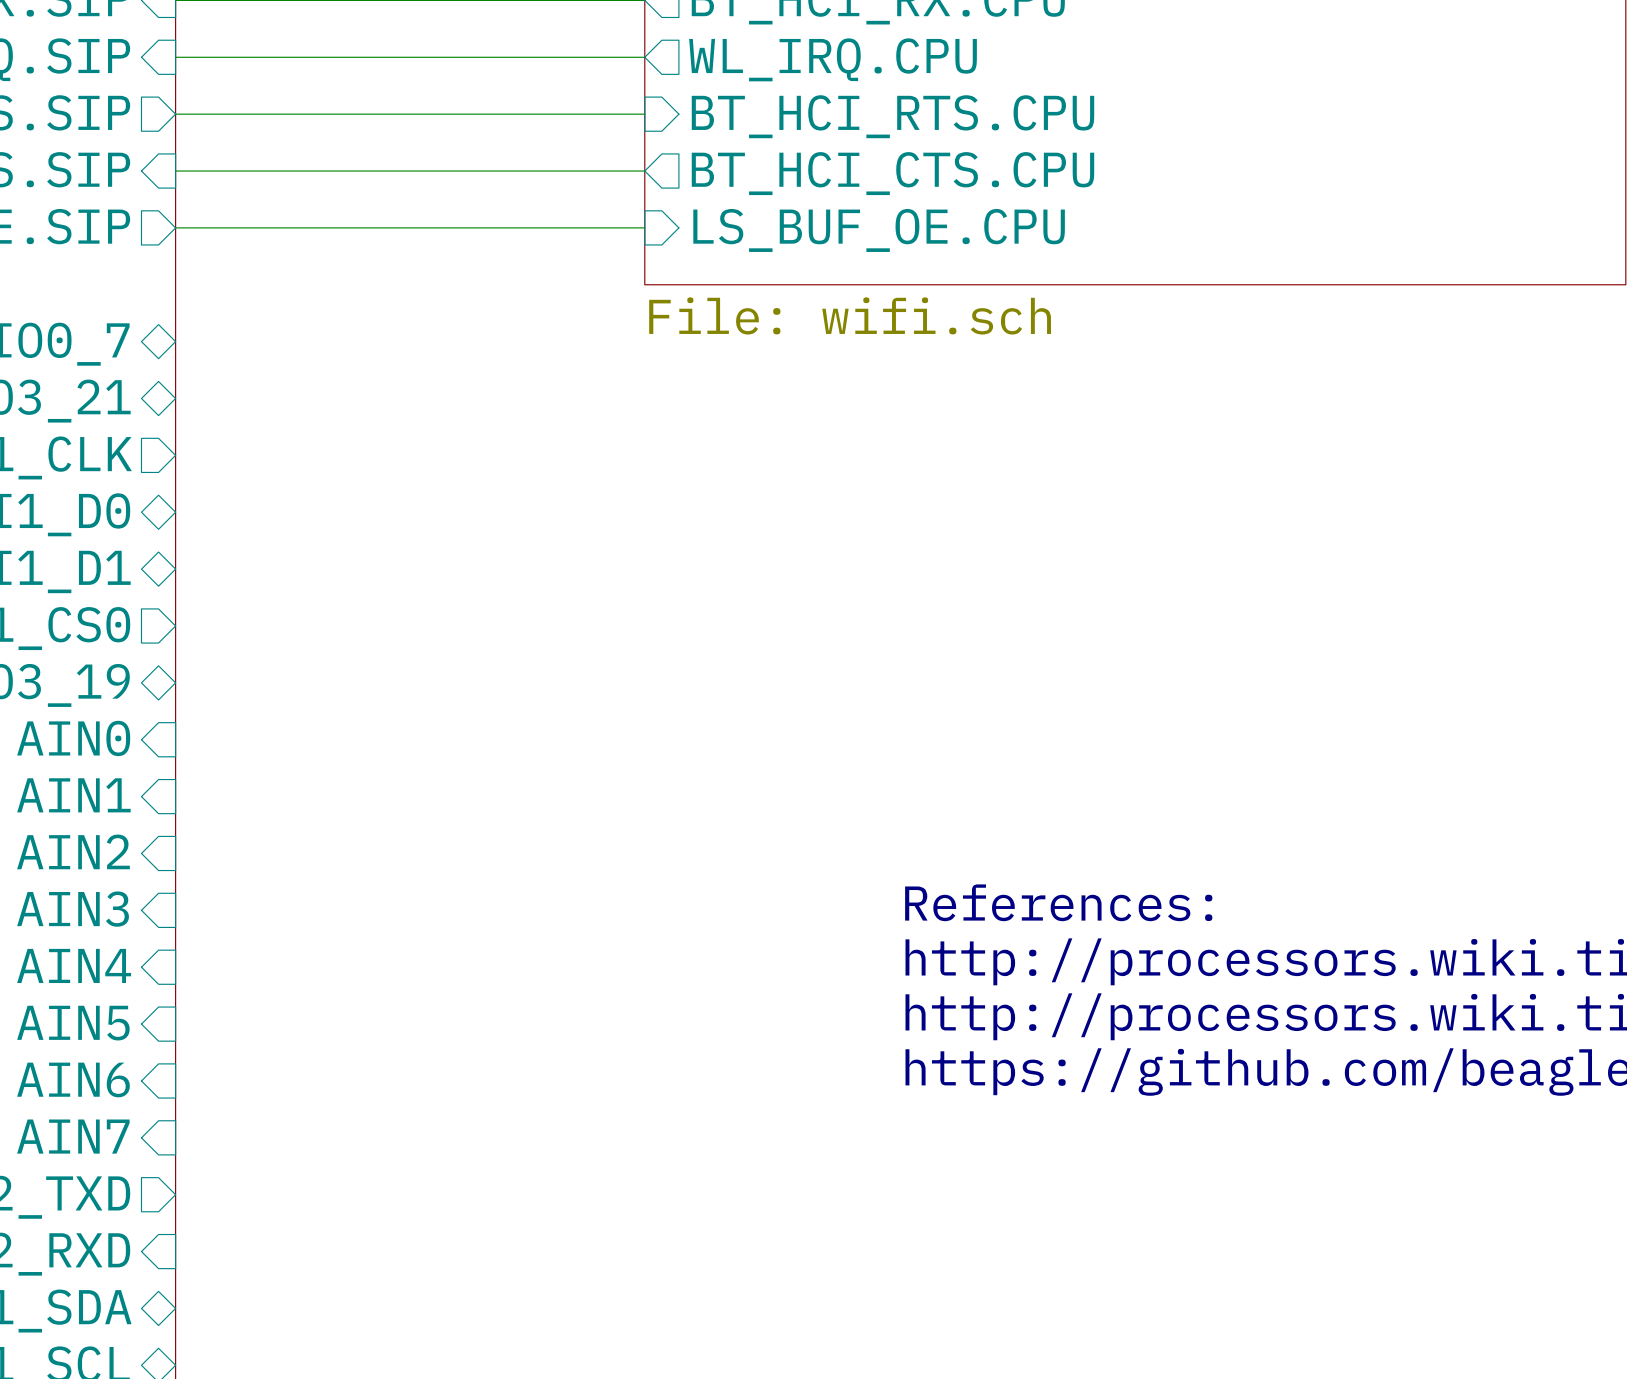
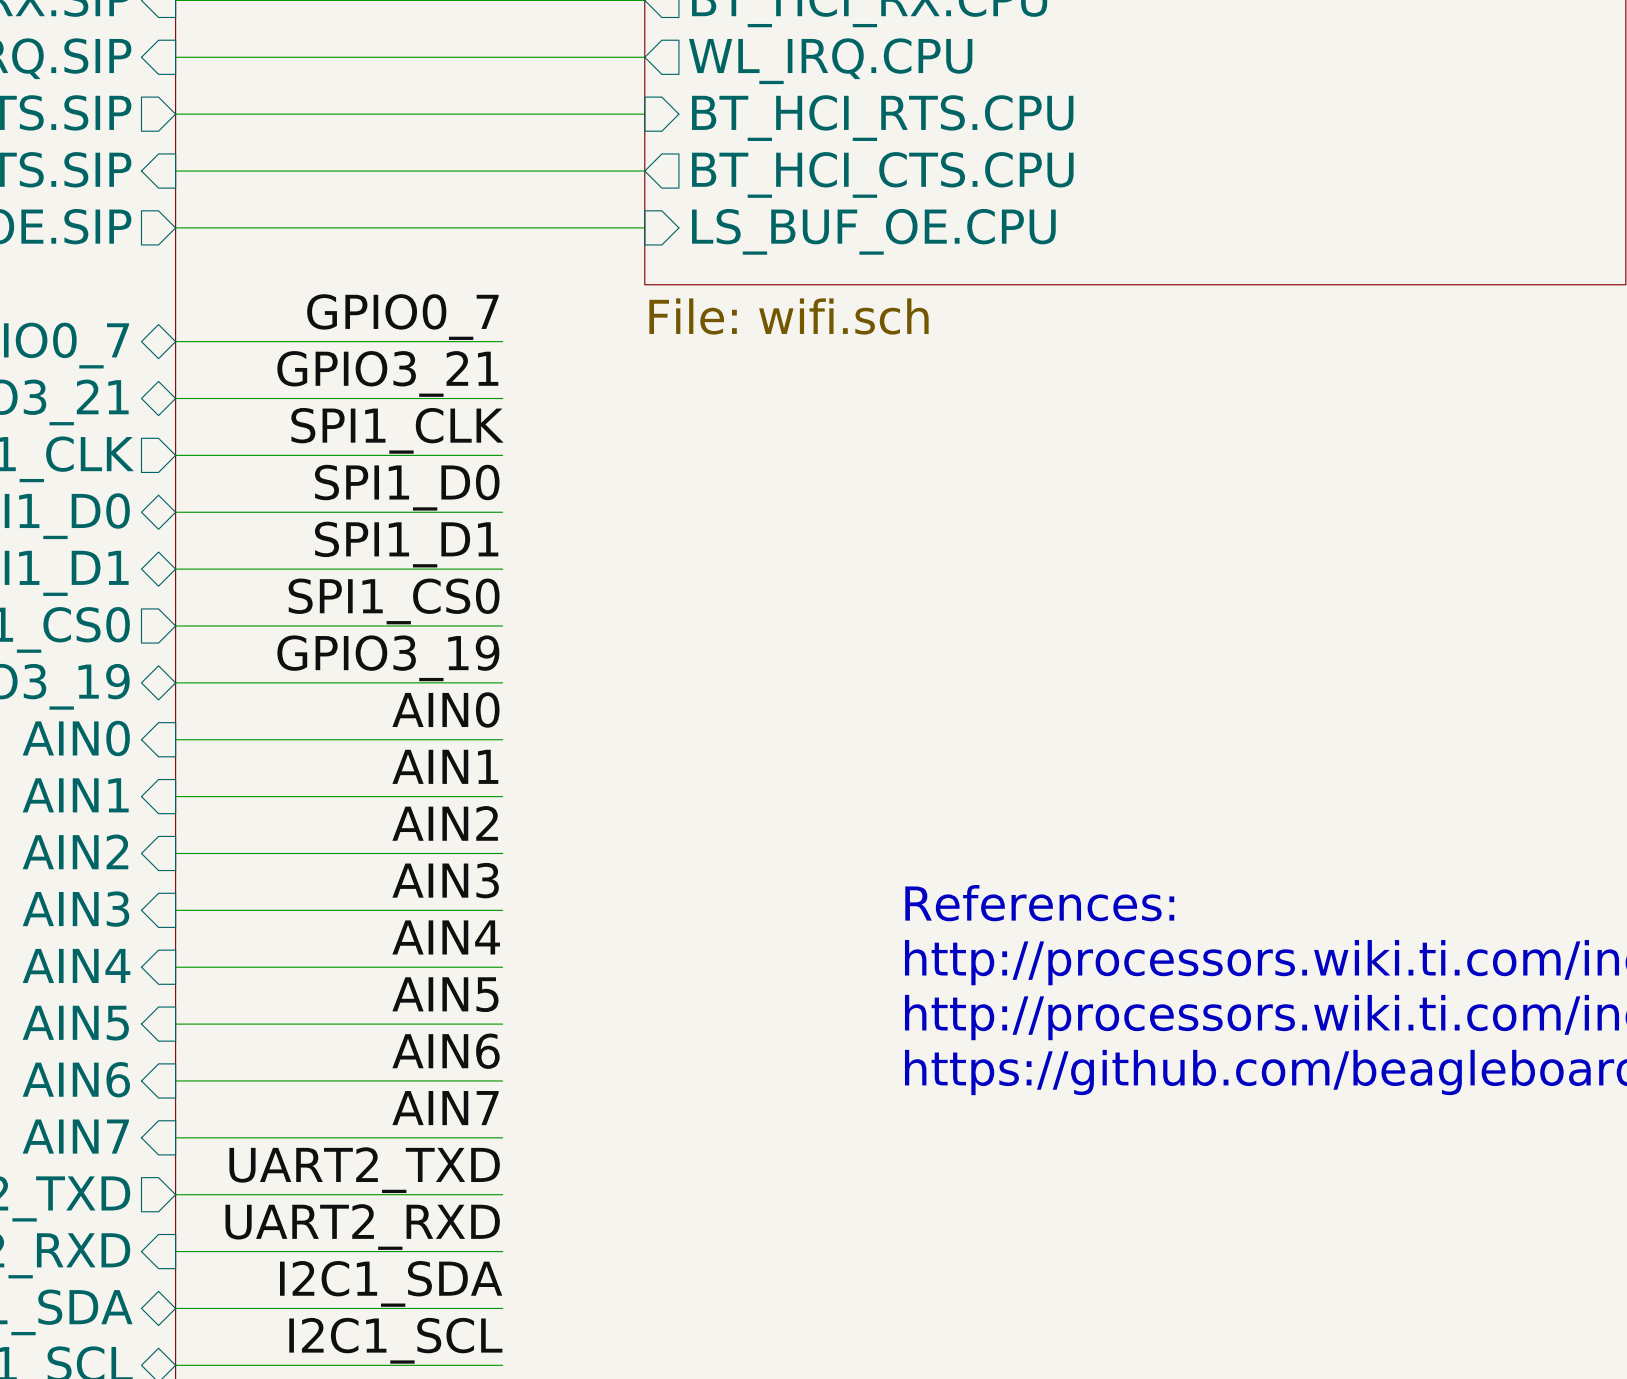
label: none -> GPIO0_7 (402, 317)
wire: none -> (175, 341) (502, 341)
label: none -> GPIO3_21 (387, 373)
wire: none -> (175, 398) (502, 398)
label: none -> SPI1_CLK (397, 430)
wire: none -> (175, 455) (502, 455)
label: none -> SPI1_D0 (407, 487)
wire: none -> (175, 512) (502, 512)
label: none -> SPI1_D1 (406, 544)
wire: none -> (175, 569) (502, 569)
label: none -> SPI1_CS0 (394, 601)
wire: none -> (175, 625) (502, 625)
label: none -> GPIO3_19 (388, 658)
wire: none -> (175, 682) (502, 682)
label: none -> AIN0 (445, 709)
wire: none -> (175, 739) (502, 739)
label: none -> AIN1 (445, 766)
wire: none -> (175, 796) (502, 796)
label: none -> AIN2 (445, 823)
wire: none -> (175, 853) (502, 853)
label: none -> AIN3 (445, 880)
wire: none -> (175, 910) (502, 910)
label: none -> AIN4 (446, 937)
wire: none -> (175, 967) (502, 967)
label: none -> AIN5 (445, 994)
wire: none -> (175, 1024) (502, 1024)
label: none -> AIN6 (446, 1051)
wire: none -> (175, 1080) (502, 1080)
label: none -> AIN7 (445, 1108)
wire: none -> (175, 1137) (502, 1137)
label: none -> UART2_TXD (364, 1170)
wire: none -> (175, 1194) (502, 1194)
label: none -> UART2_RXD (362, 1227)
wire: none -> (175, 1251) (502, 1251)
label: none -> I2C1_SDA (391, 1283)
wire: none -> (175, 1308) (502, 1308)
label: none -> I2C1_SCL (395, 1340)
wire: none -> (175, 1365) (502, 1365)

